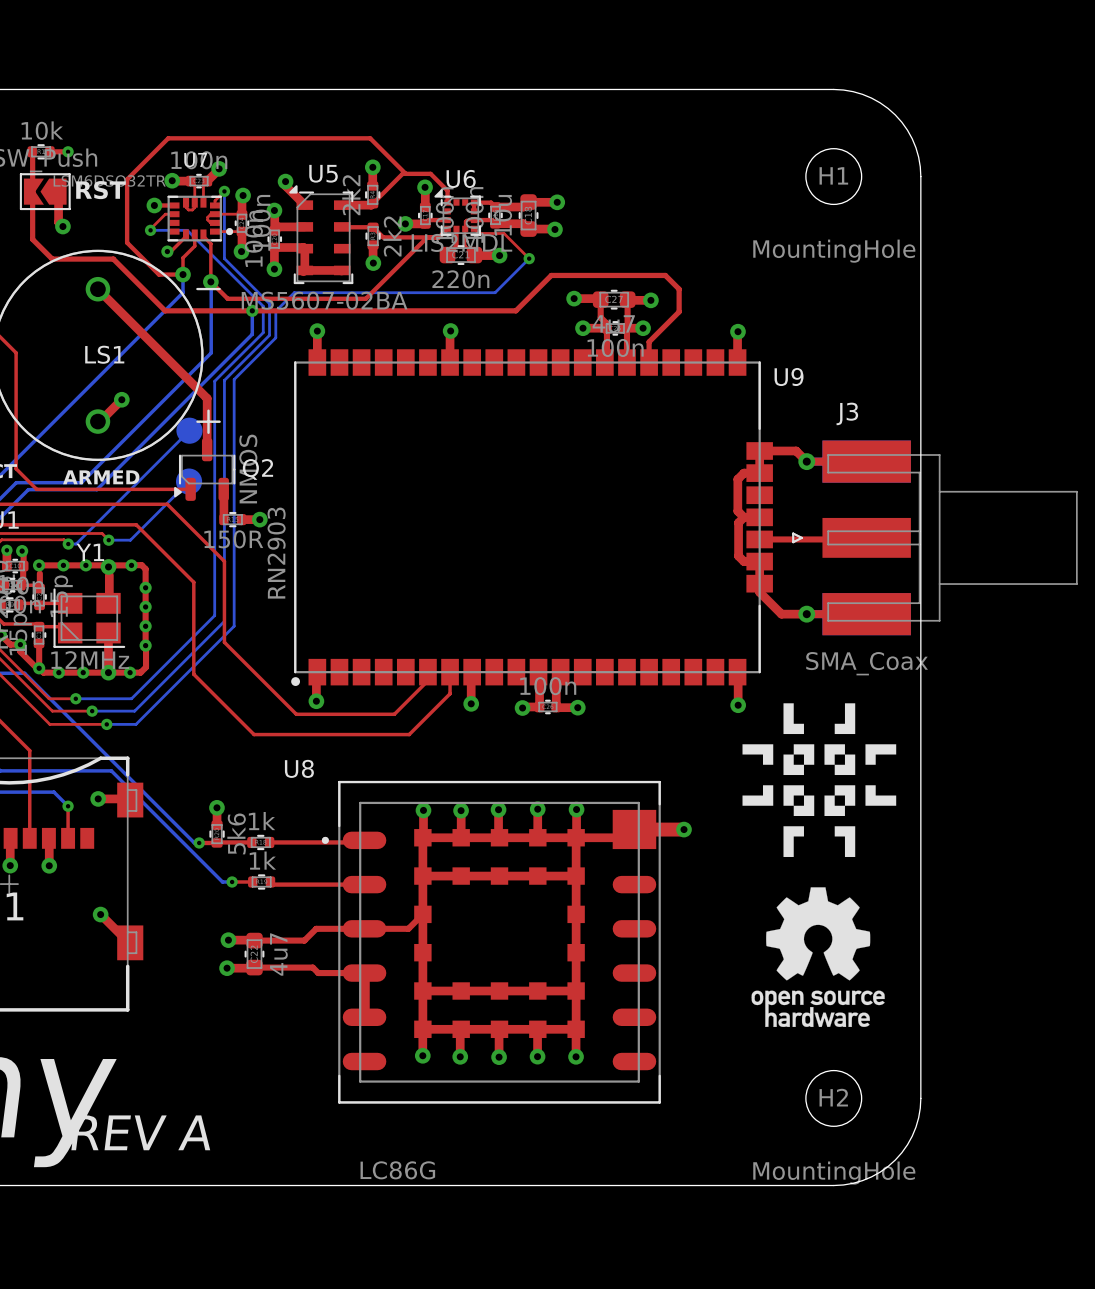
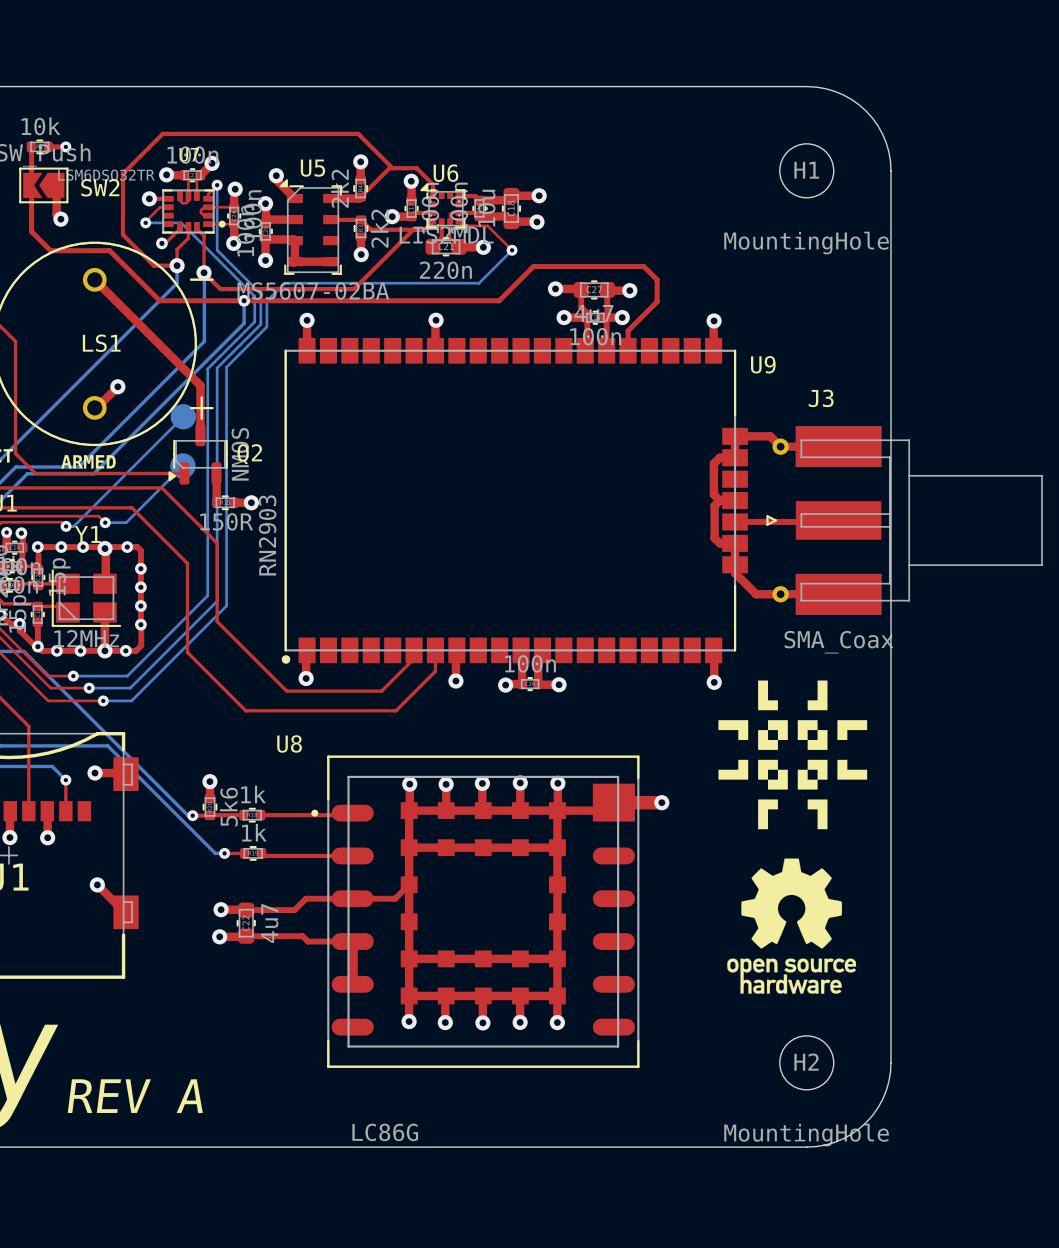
text: RST (100, 190) -> none
SW2 name: none -> SW2 (100, 187)

